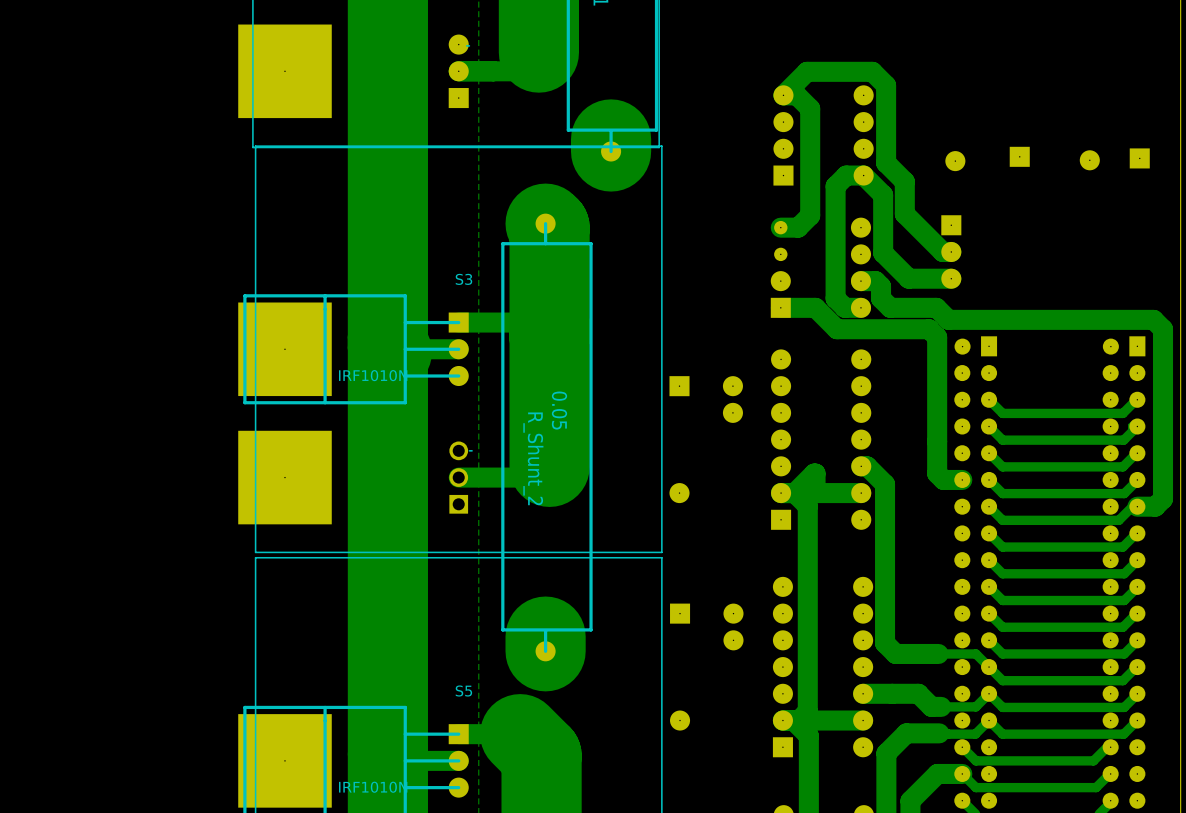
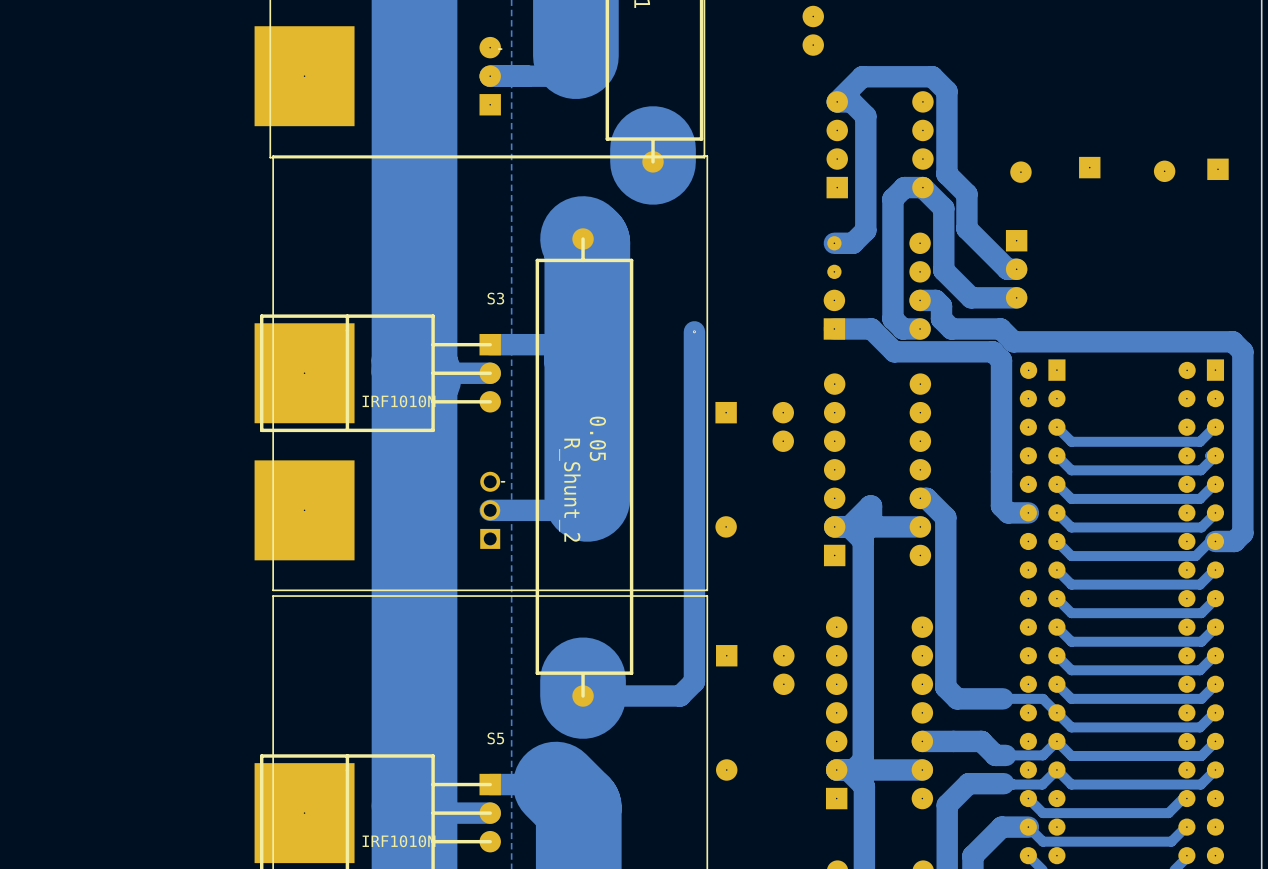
part: none -> (813, 30)
track: none -> (694, 331) (694, 681) (680, 696) (583, 696)
via: none -> (694, 331)

